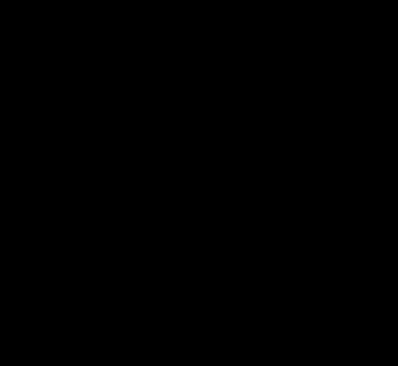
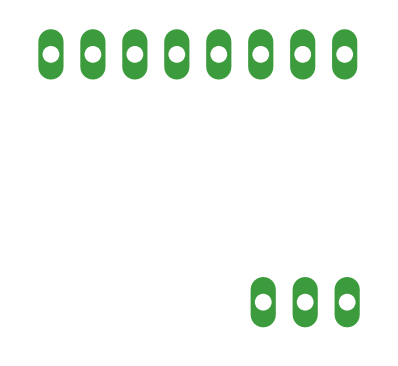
part: none -> (197, 54)
part: none -> (305, 302)

